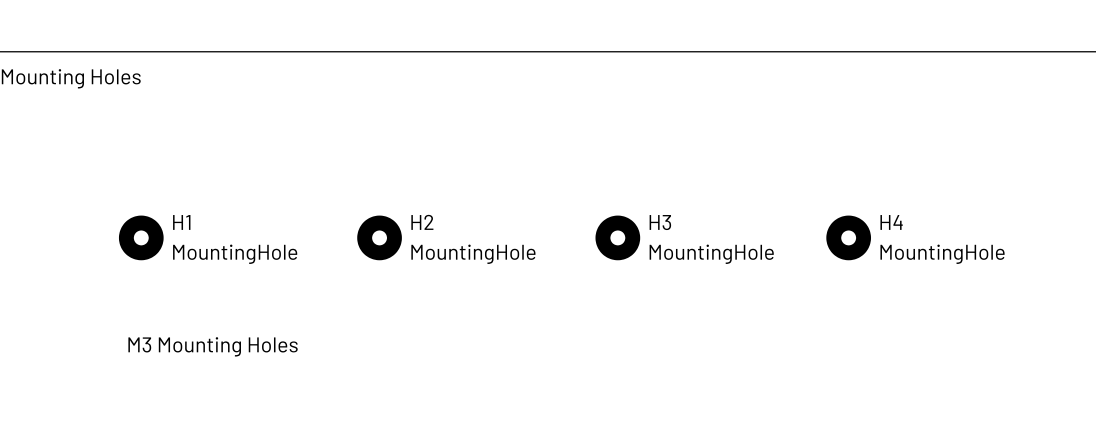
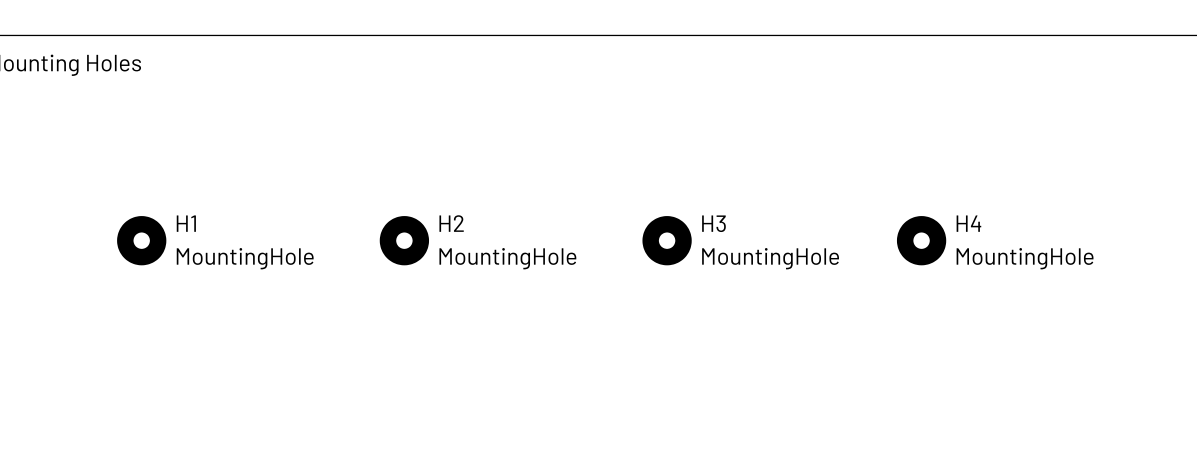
text: M3 Mounting Holes (213, 346) -> none

